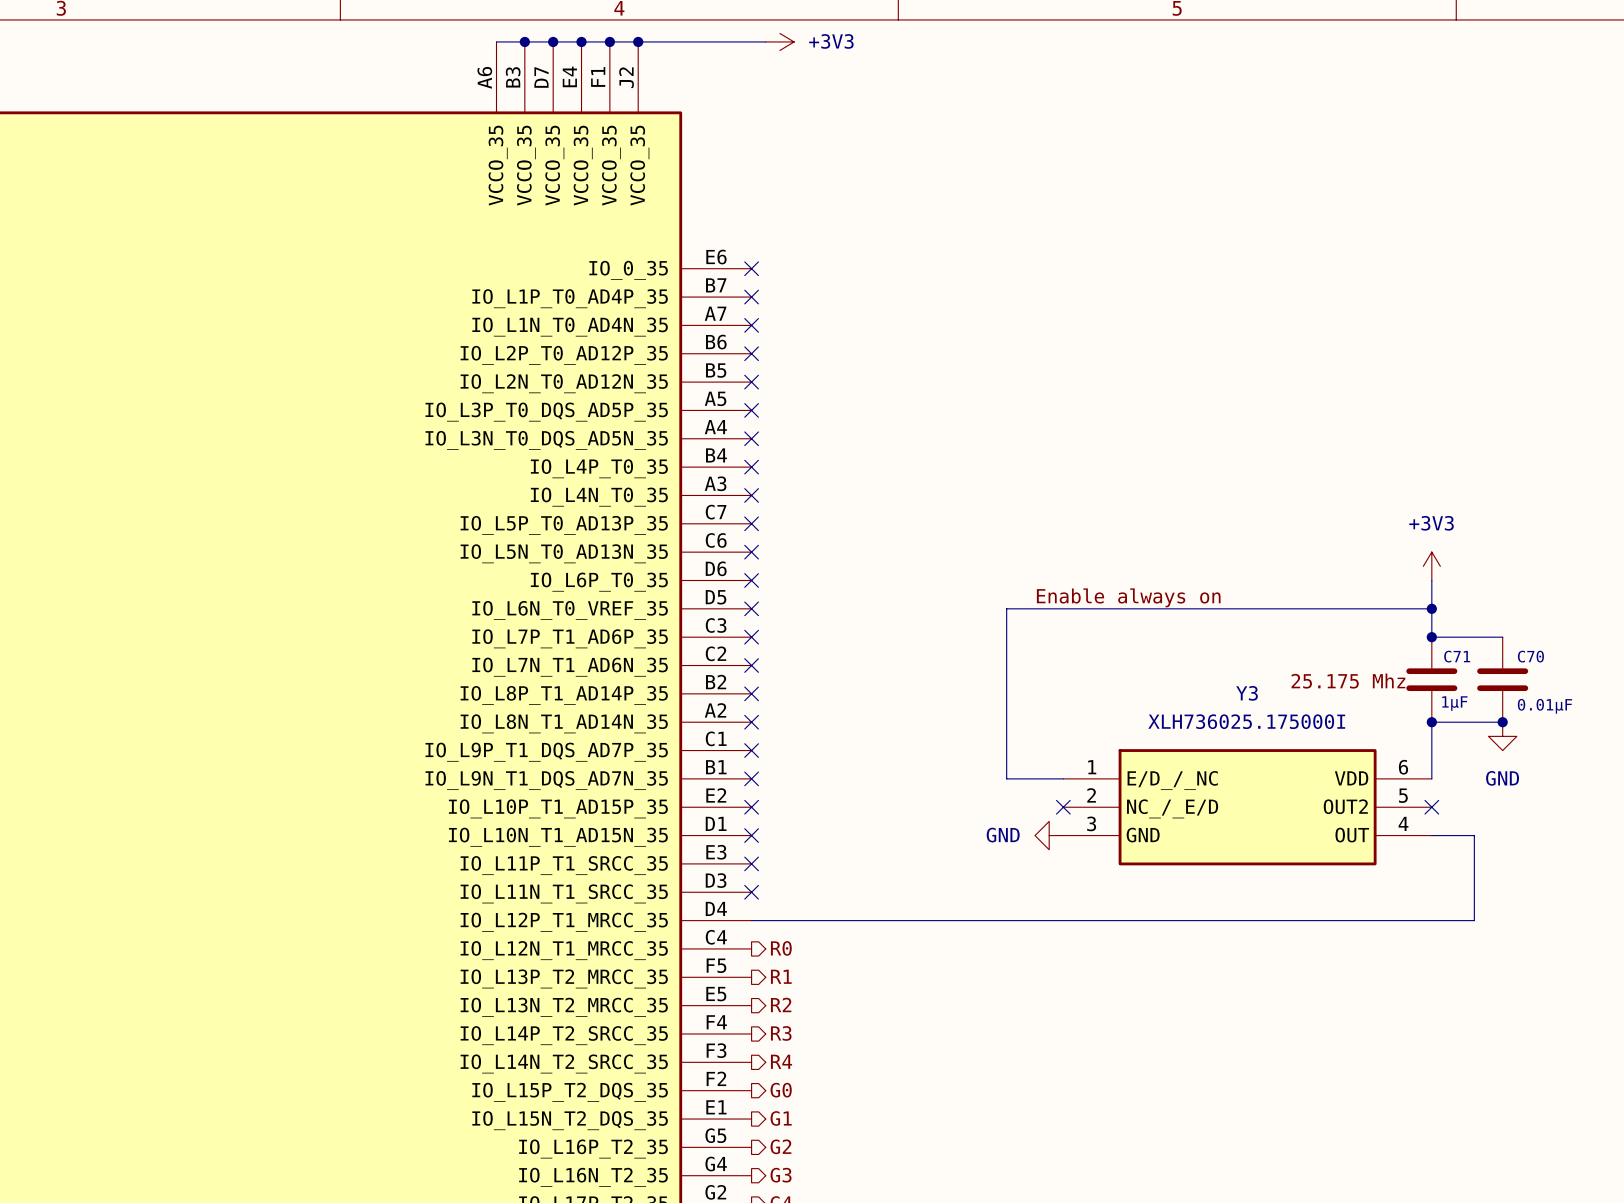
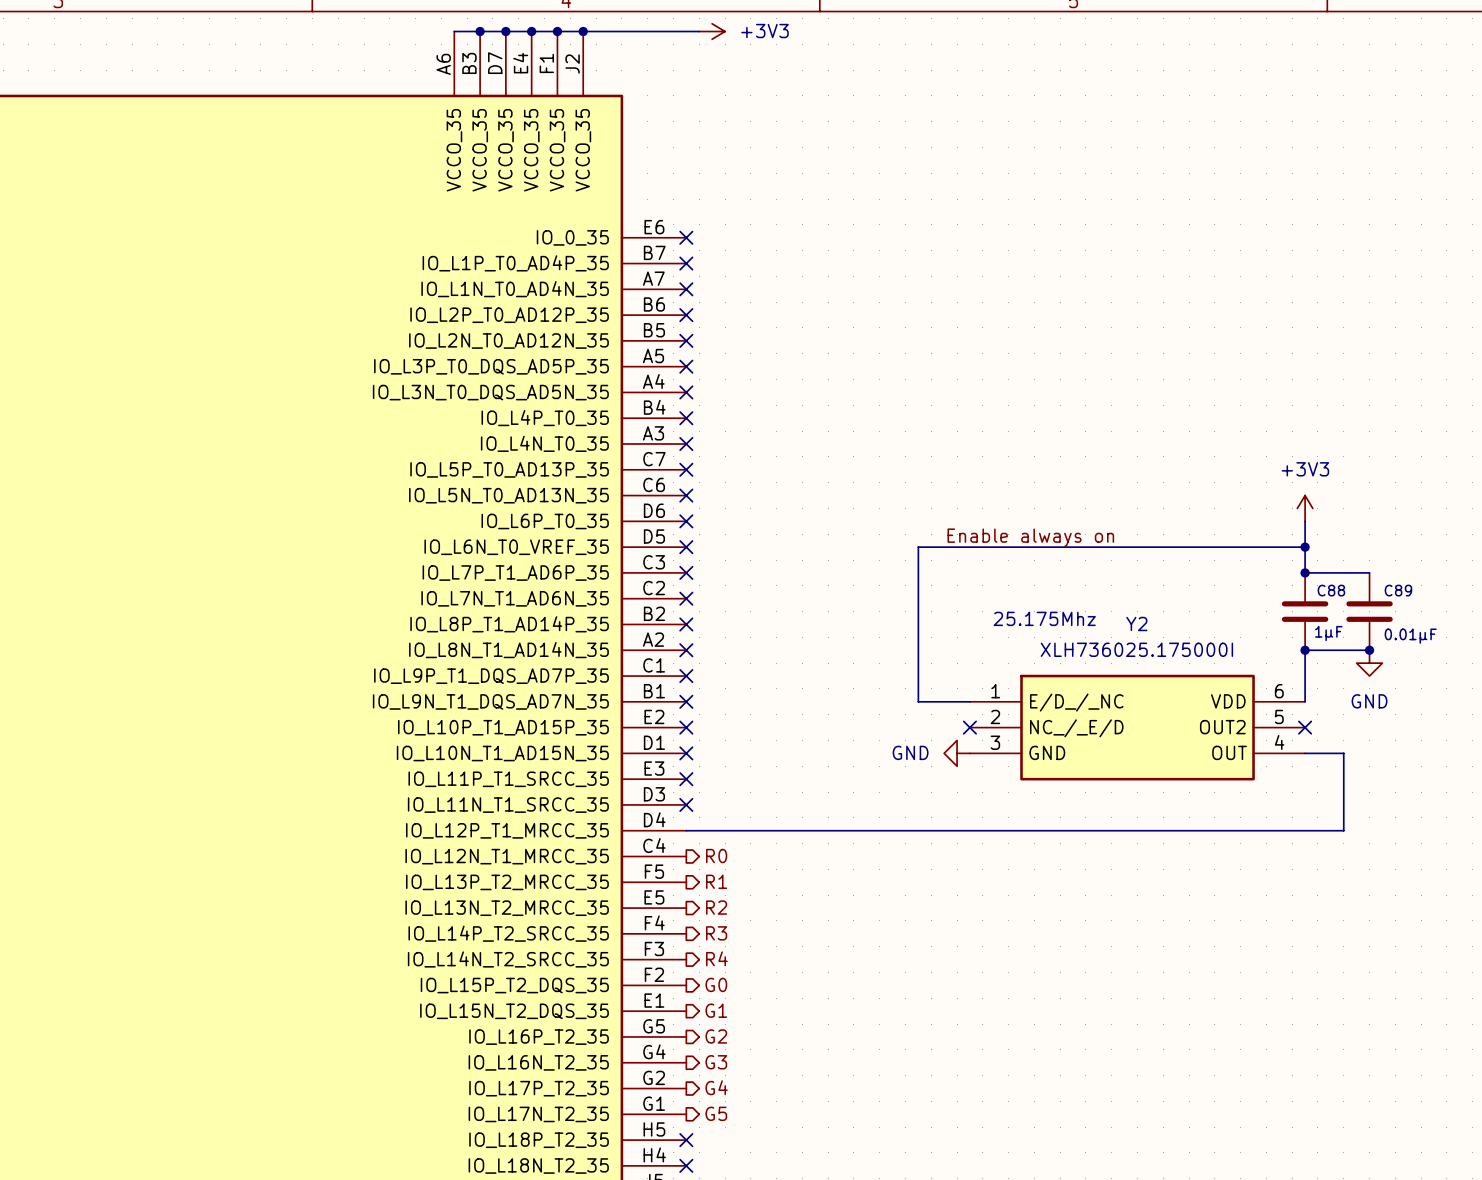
C71 name: C71 (1457, 656) -> C88 (1331, 590)
C70 name: C70 (1530, 656) -> C89 (1398, 590)
label: 25.175 Mhz (1348, 681) -> none
text: none -> 25.175Mhz (1044, 618)
Y3 name: Y3 (1247, 693) -> Y2 (1136, 623)

